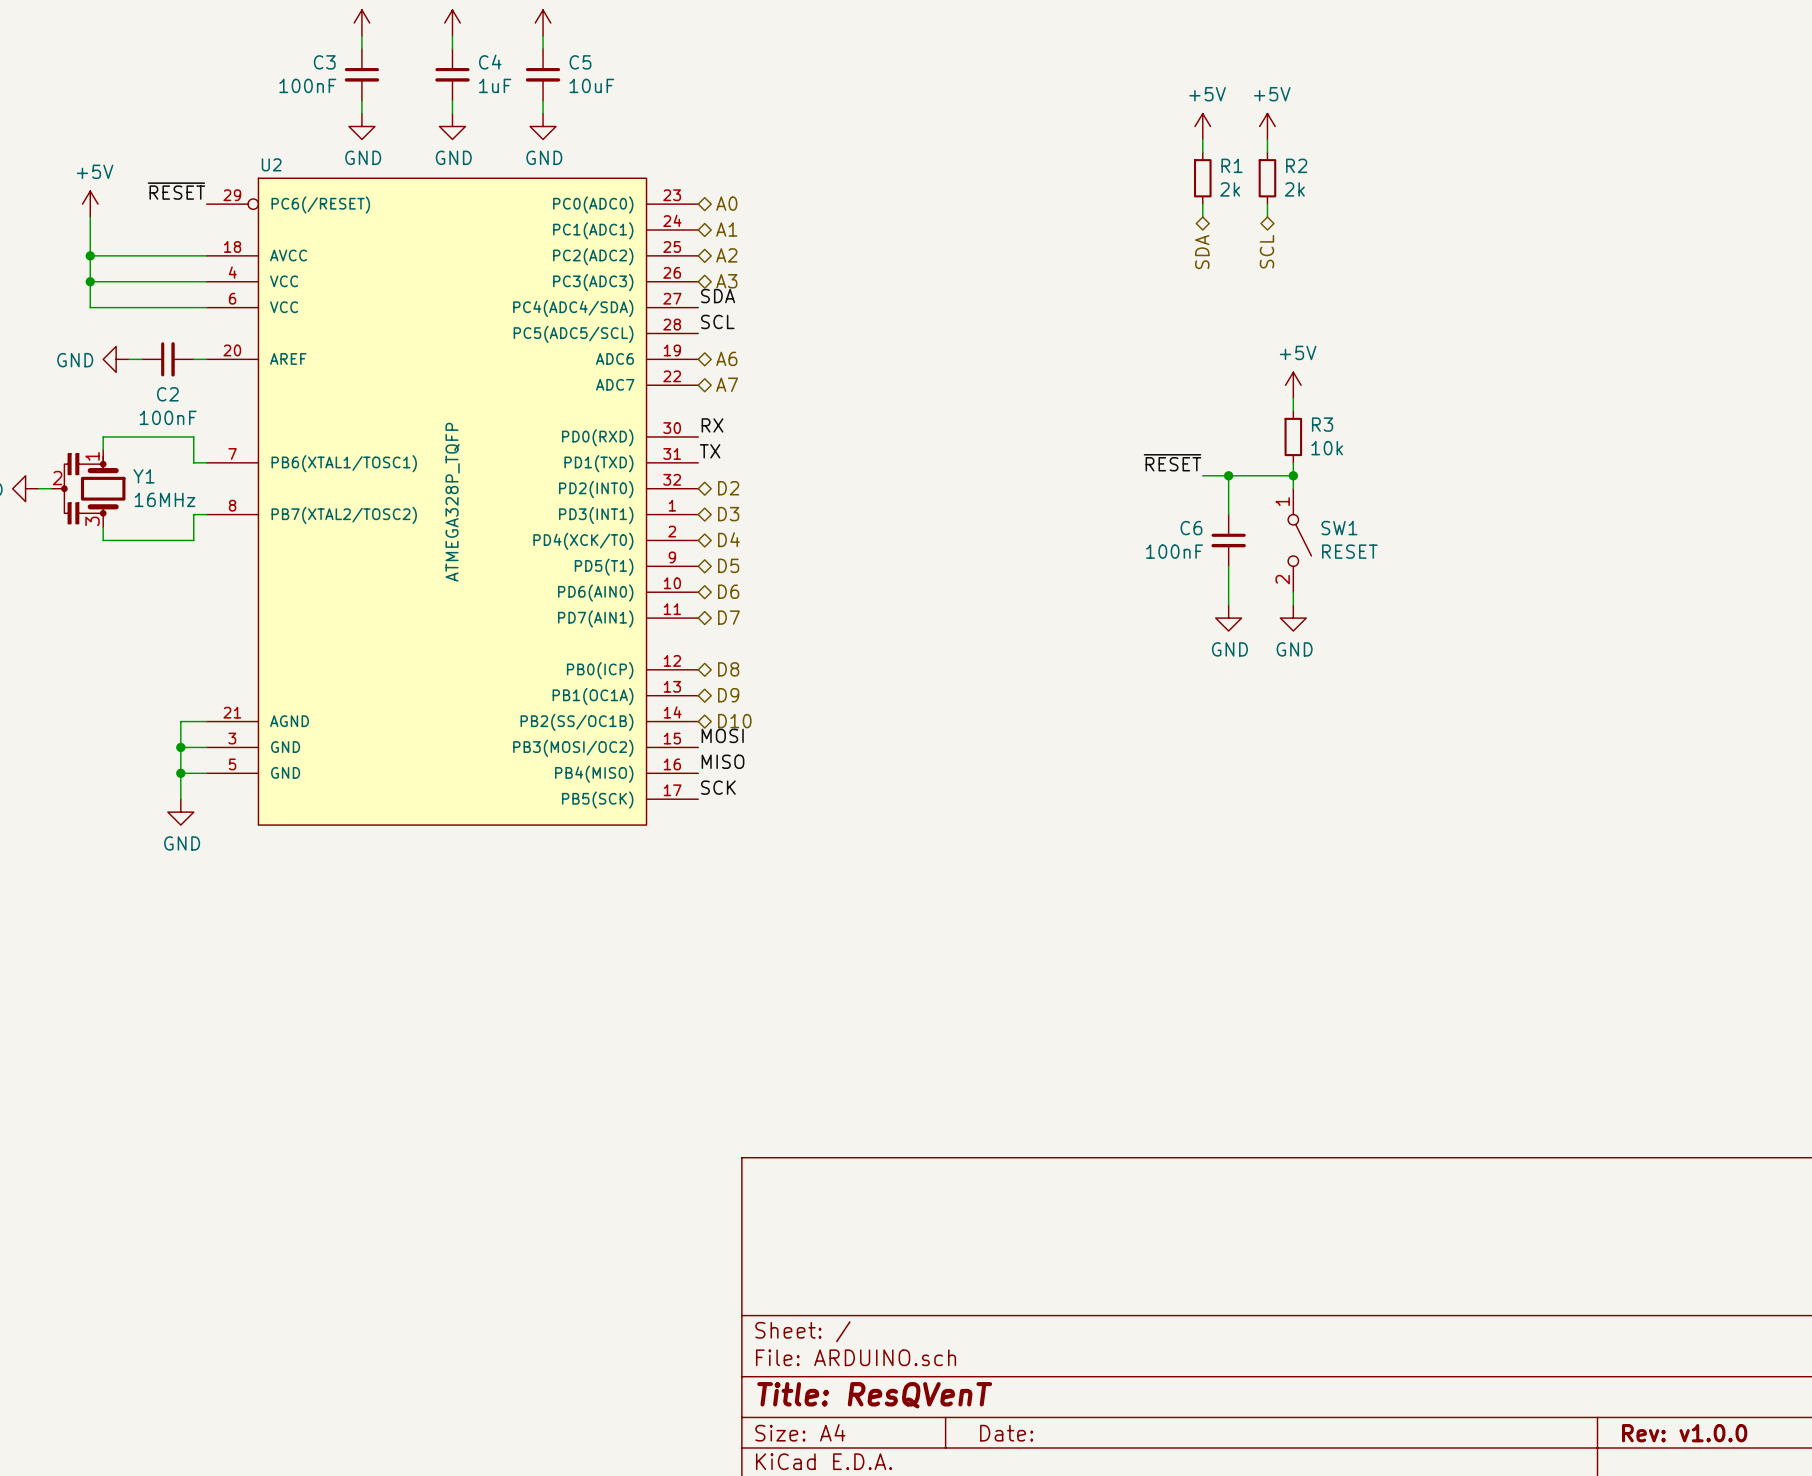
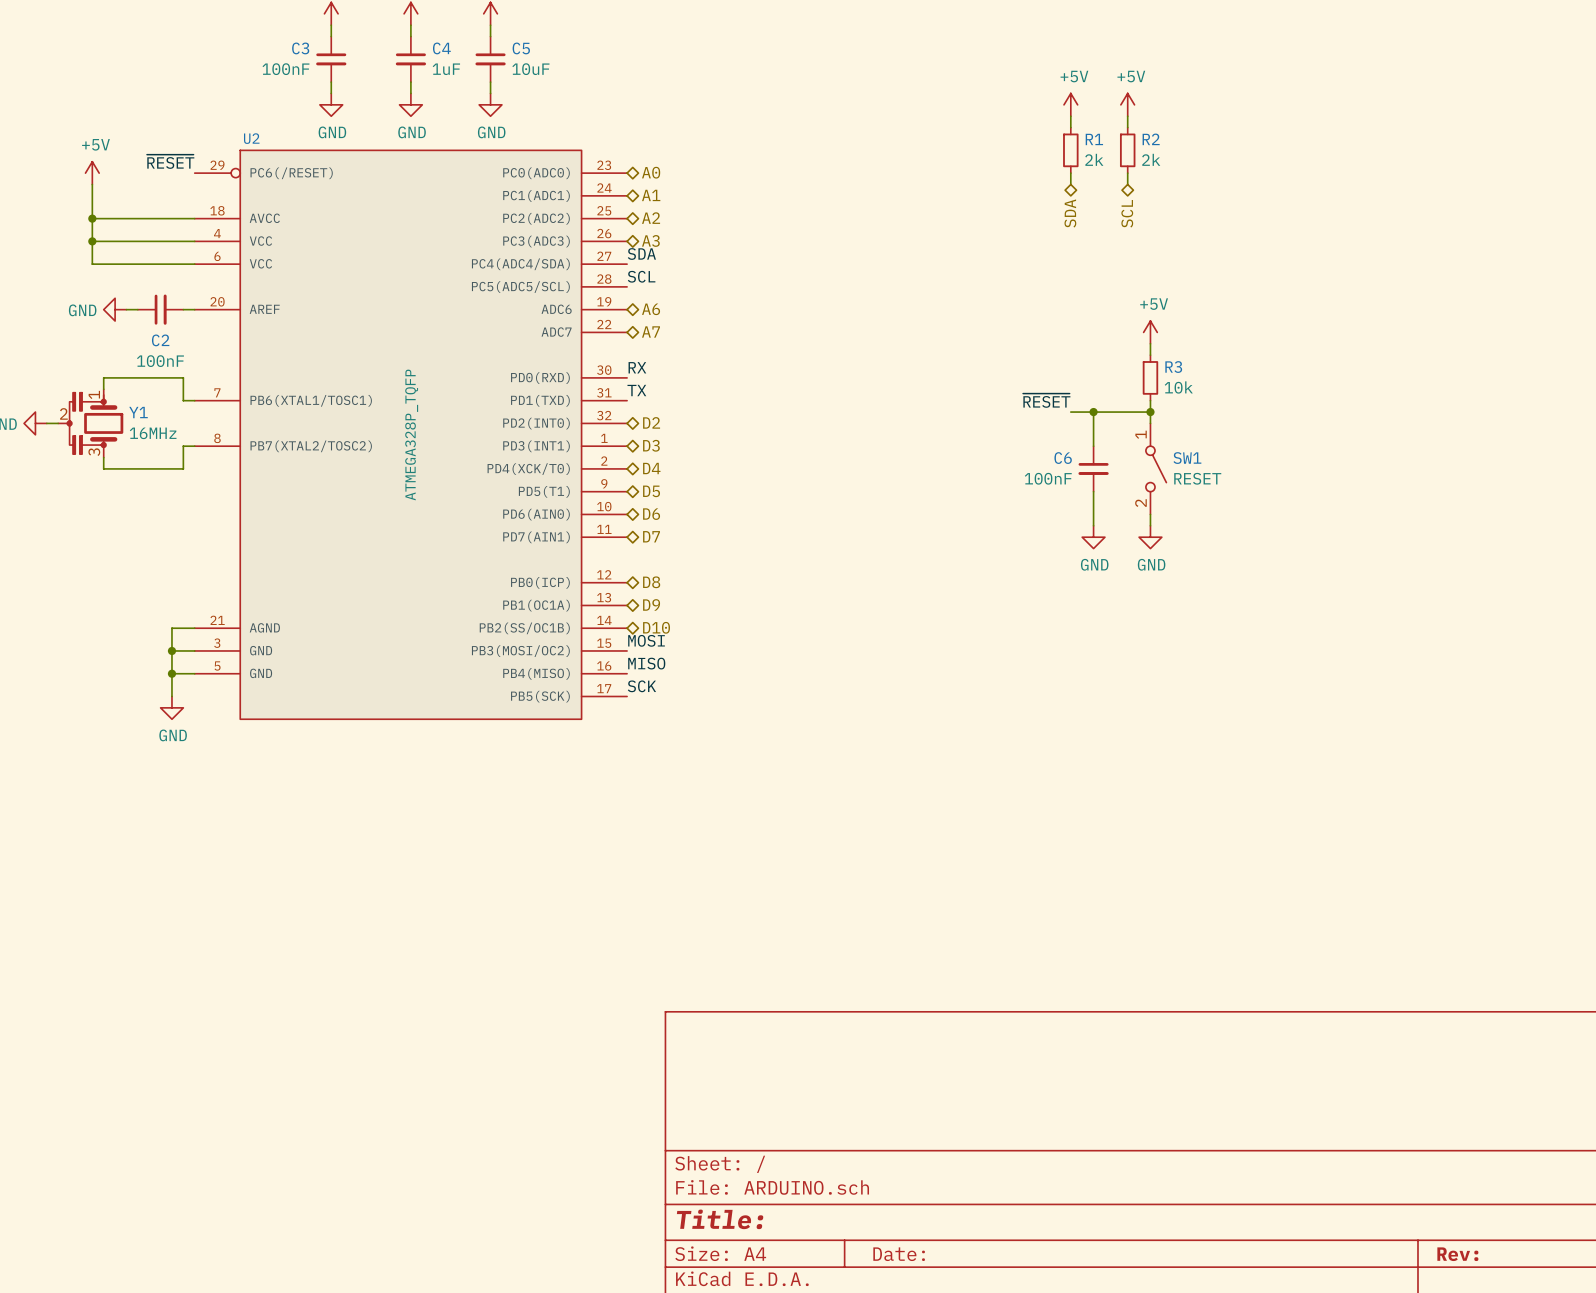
title block: Title: ResQVenT (874, 1395) -> Title: (720, 1219)
title block: Rev: v1.0.0 (1684, 1433) -> Rev: (1457, 1254)

